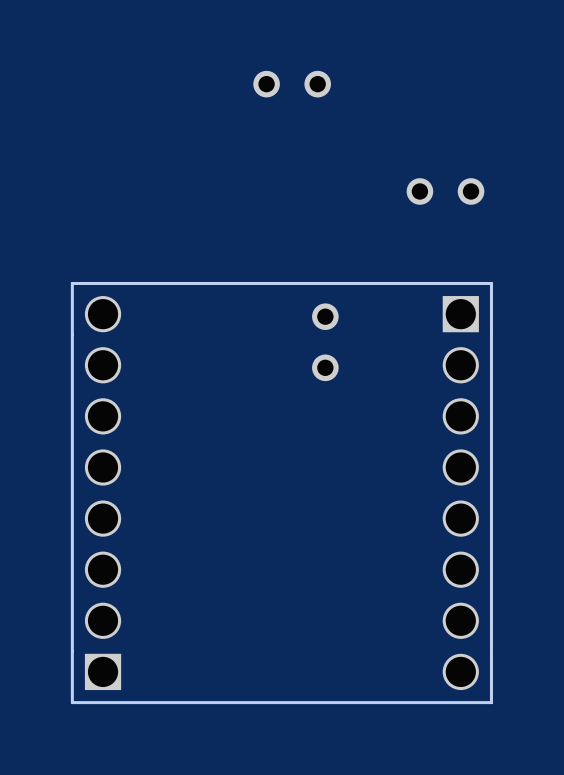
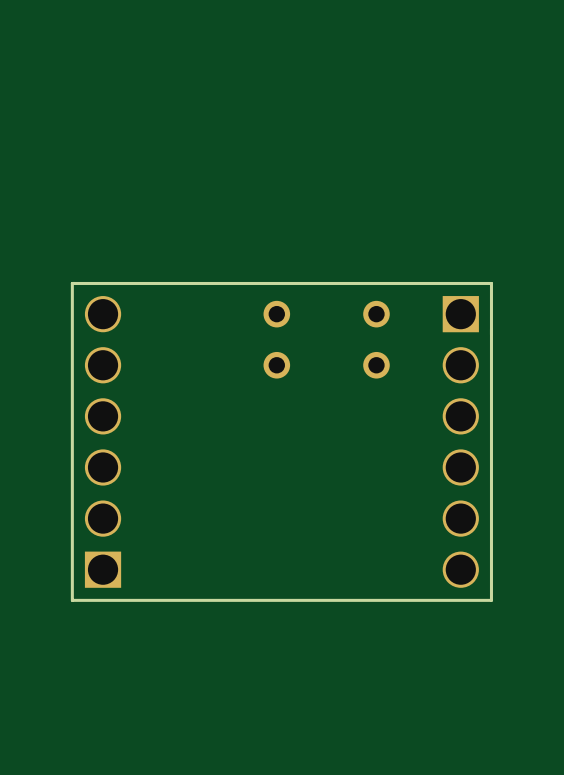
part: (292, 84) -> none
part: (445, 191) -> none
part: none -> (276, 339)
part: none -> (376, 339)
part: (325, 342) -> none
part: none -> (103, 441)
part: (103, 493) -> none
part: (460, 493) -> none
board edge: (491, 600) (491, 702) (72, 702) (72, 600) -> (491, 600) (72, 600)

